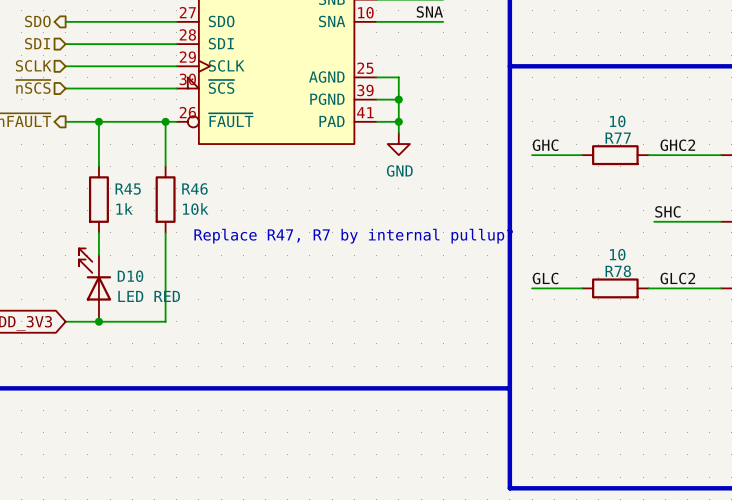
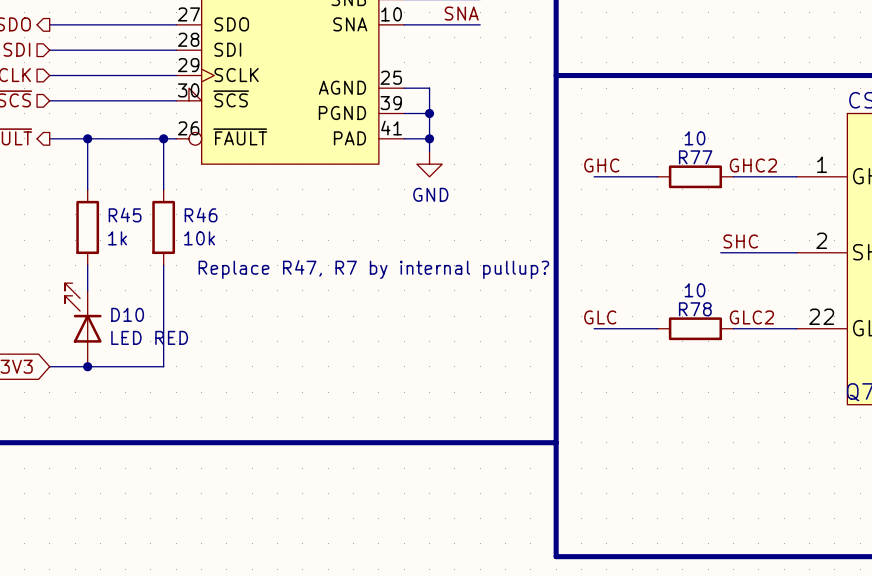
wire: (532, 155) (543, 155) -> none
R77 position: (615, 155) -> (695, 176)
wire: (532, 288) (543, 288) -> none
R78 position: (615, 288) -> (695, 328)

